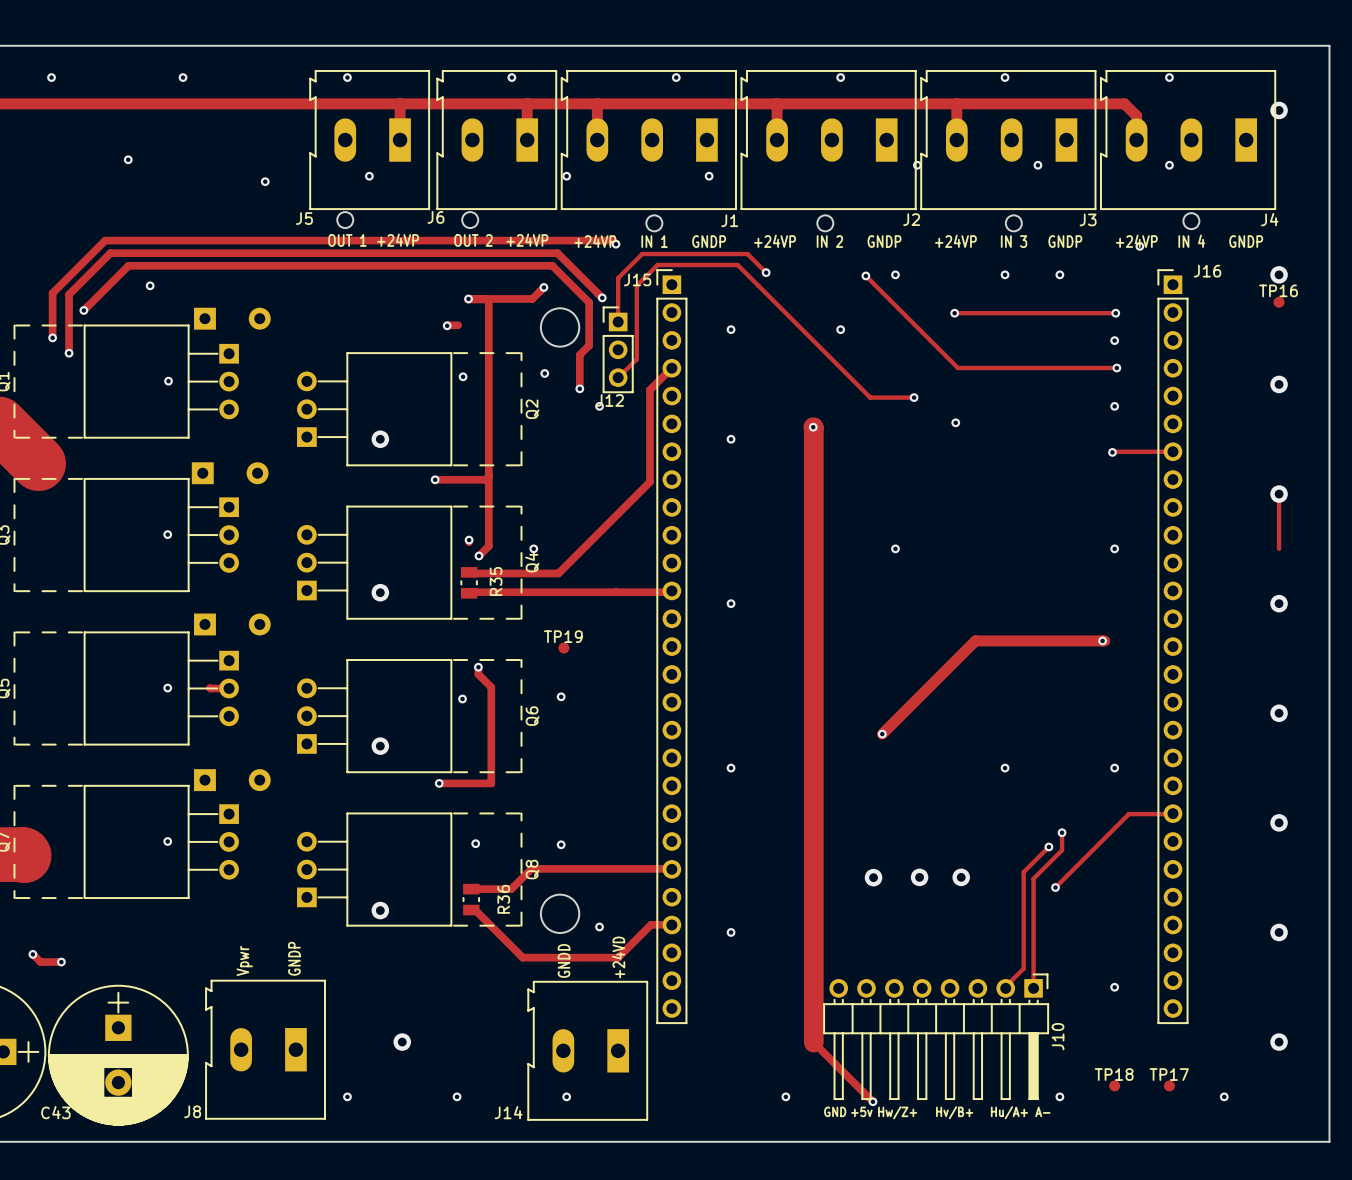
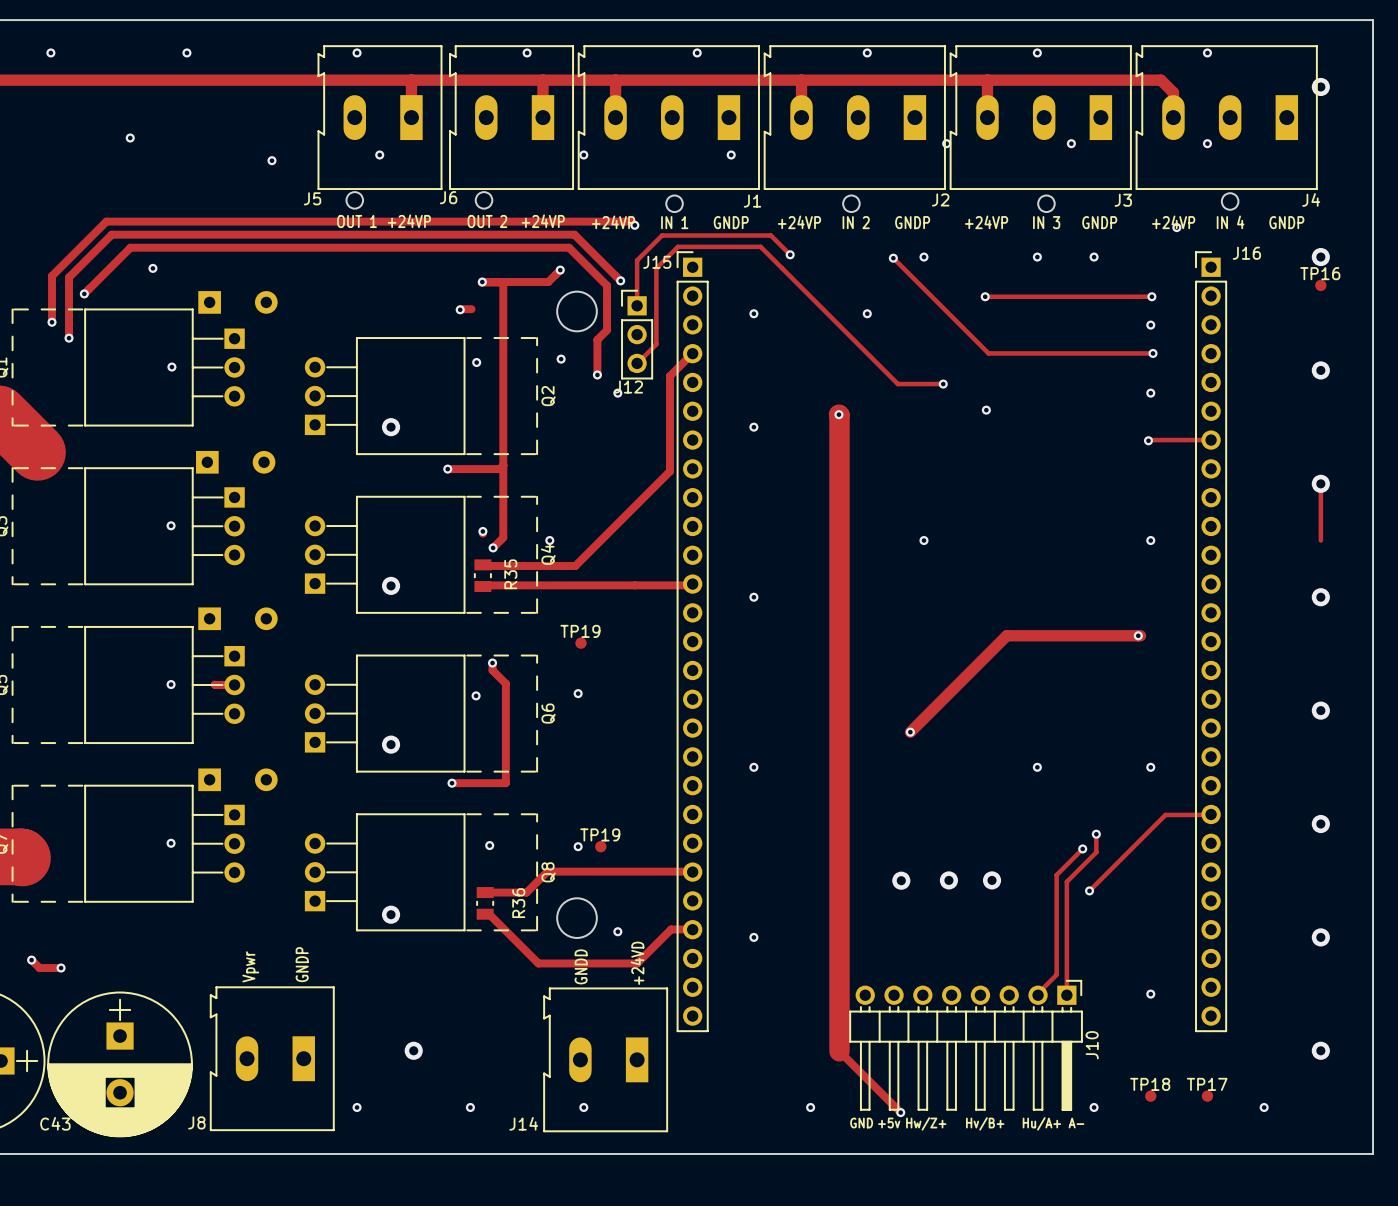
TP19: none -> (600, 846)

